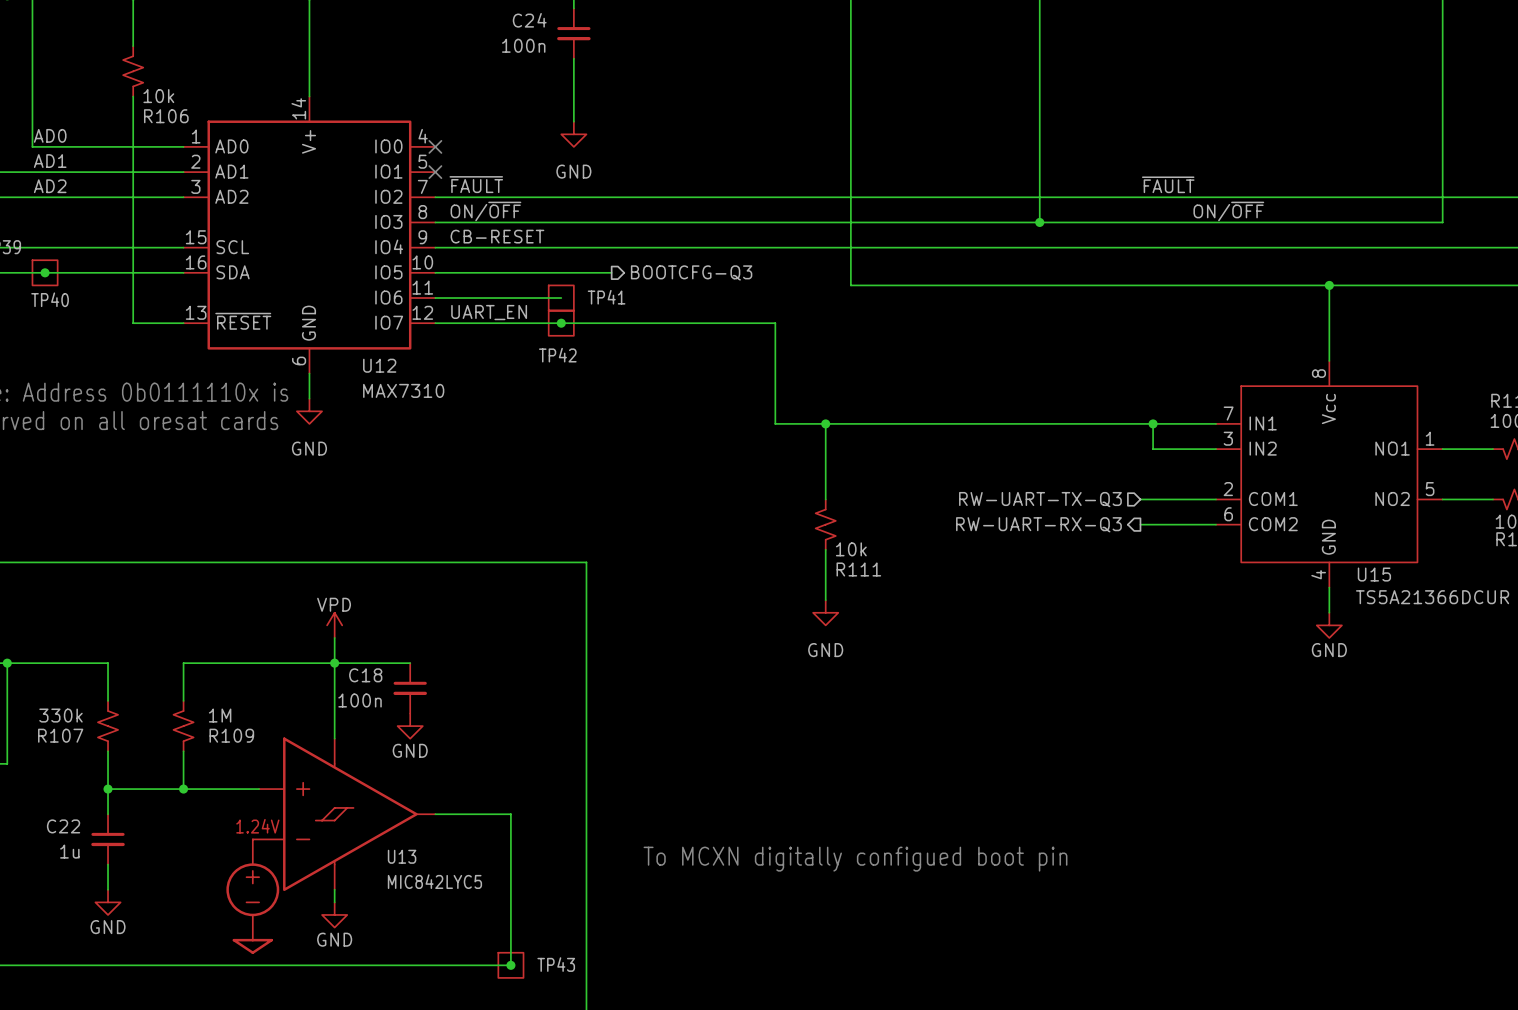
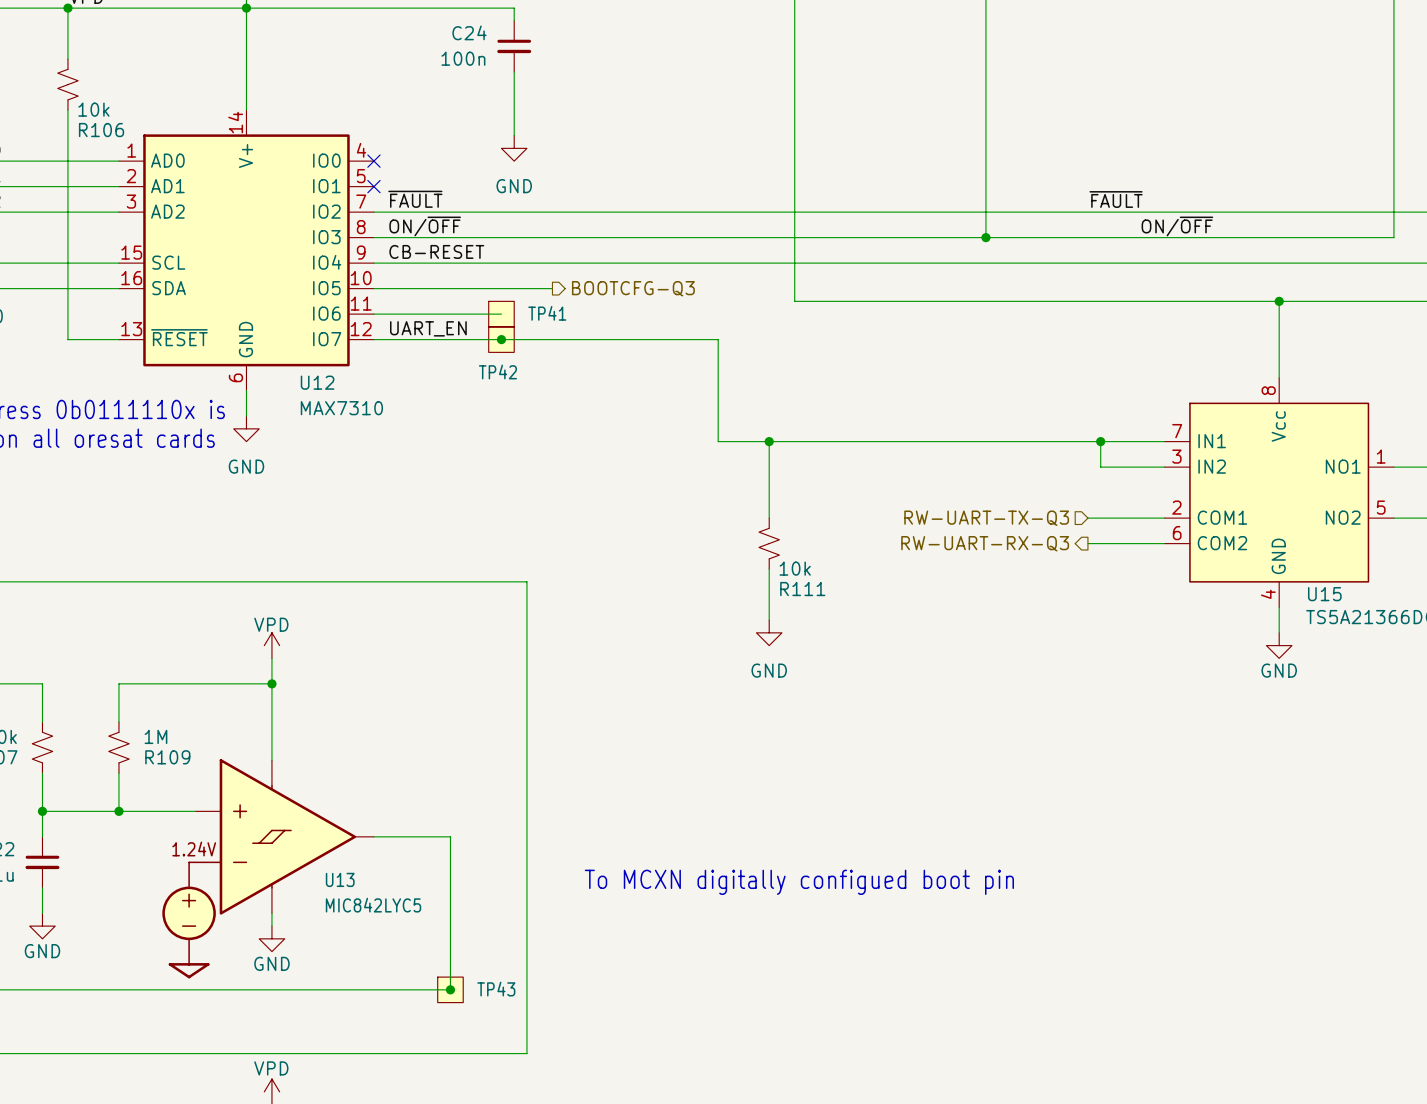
wire: (334, 663) (410, 663) -> none
C18: 100n (410, 688) -> none
power symbol: GND (410, 726) -> none

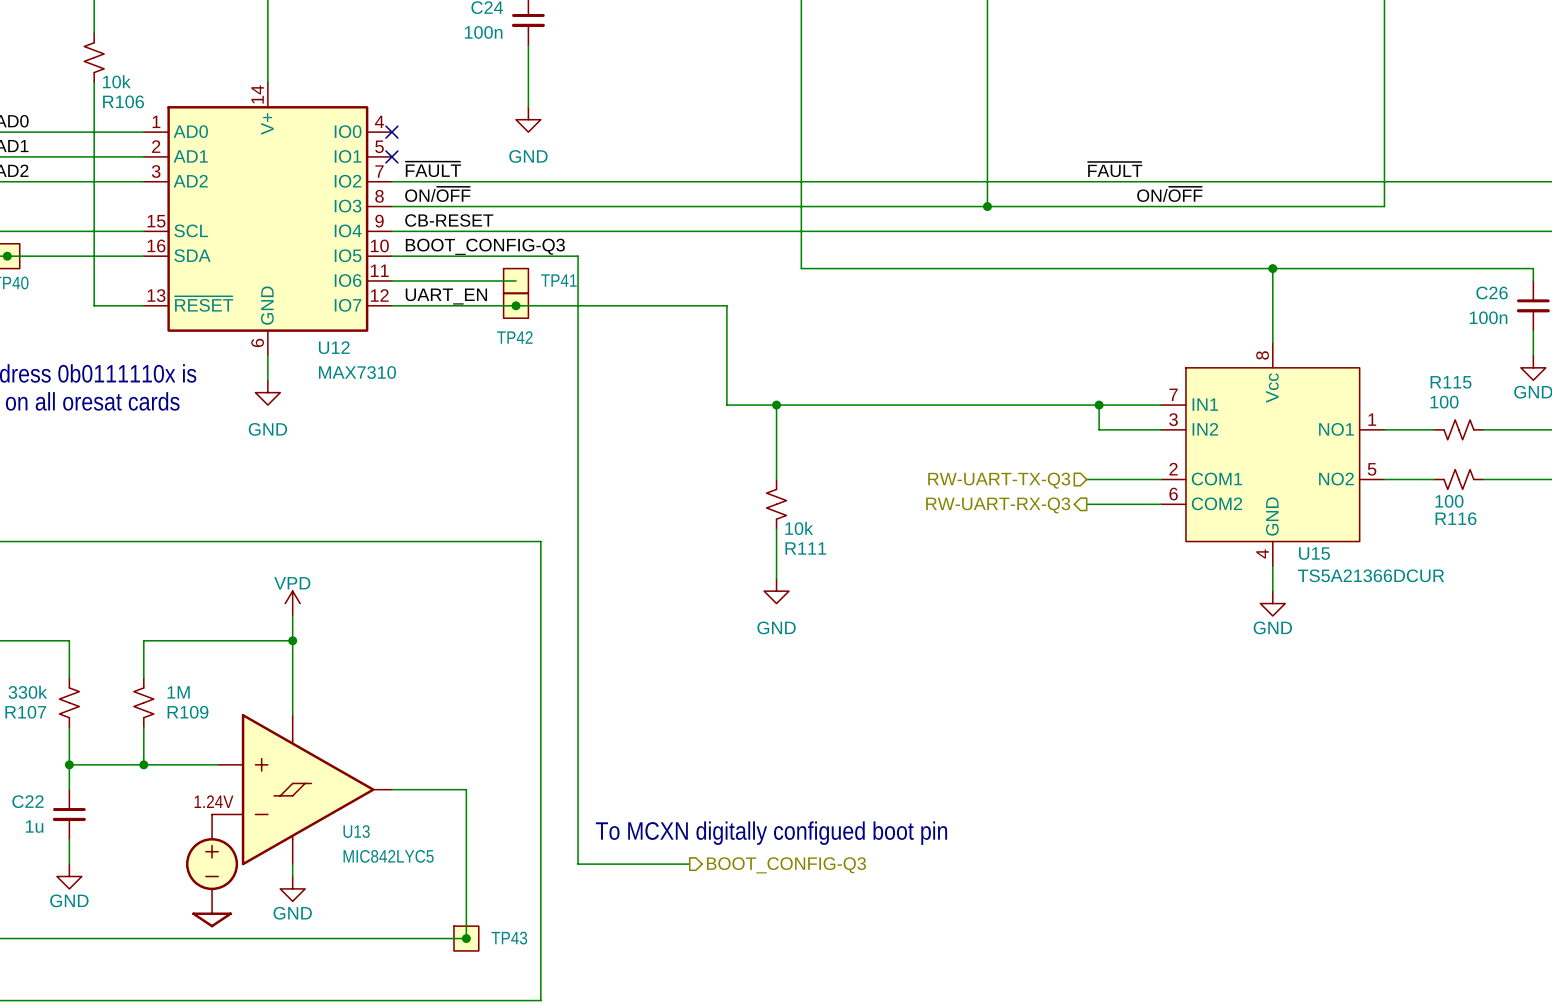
label: none -> BOOT_CONFIG-Q3 (485, 246)
wire: none -> (565, 256) (578, 256) (578, 864) (689, 864)
hierarchical label: BOOTCFG-Q3 (633, 288) -> none
hierarchical label: none -> BOOT_CONFIG-Q3 (786, 865)

